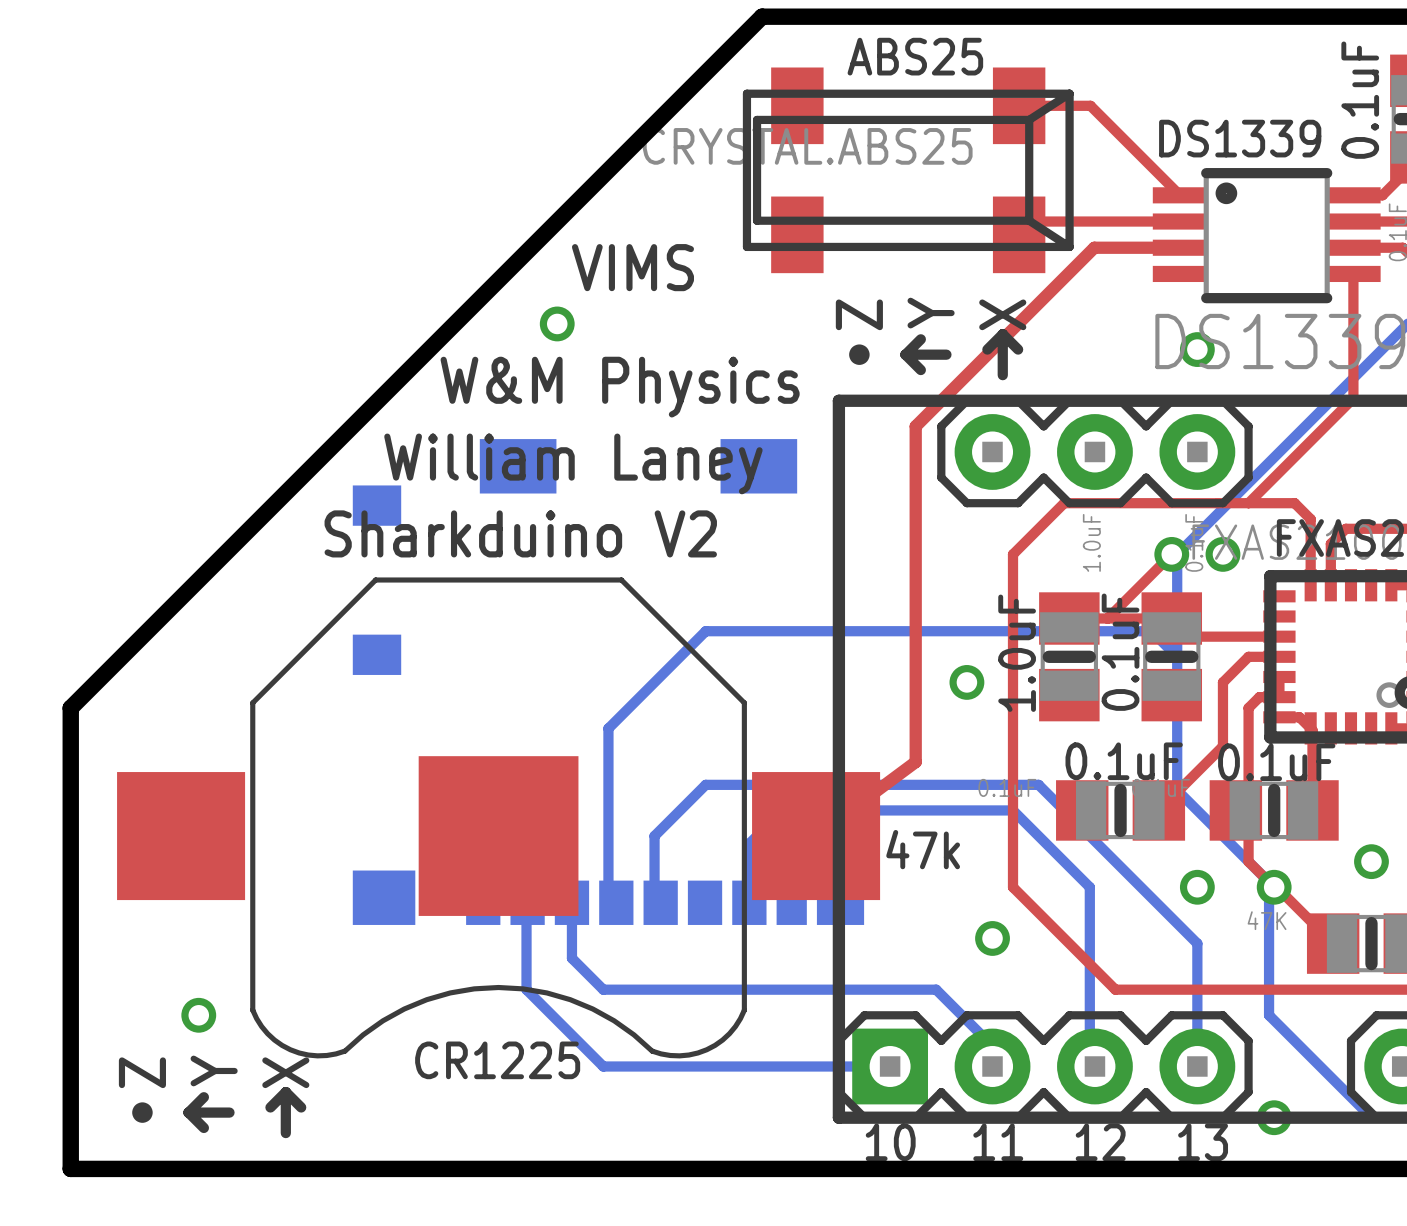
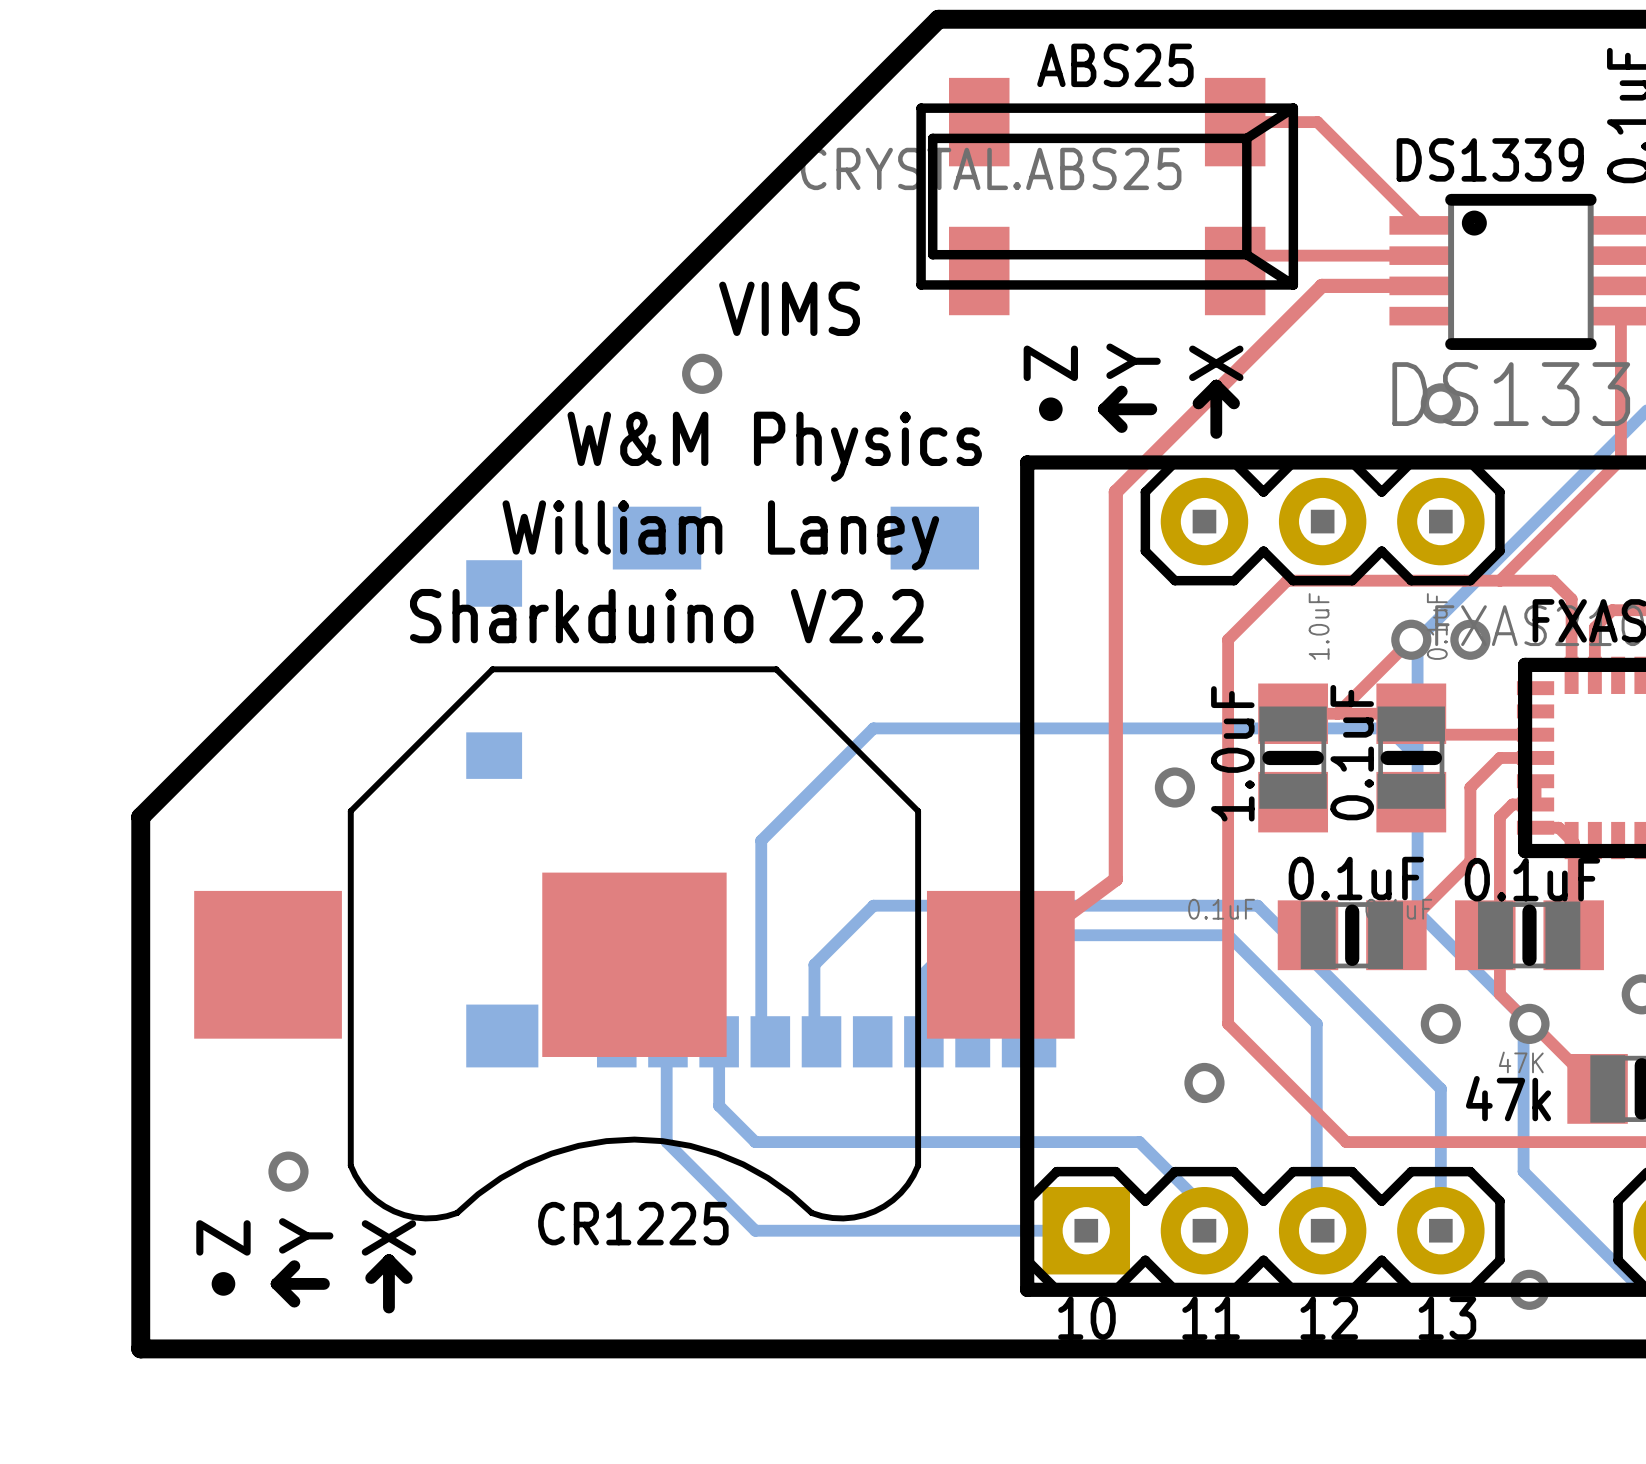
text: Sharkduino V2 (520, 533) -> Sharkduino V2.2 (666, 616)
text position: 47k (923, 849) -> 47k (1508, 1098)

